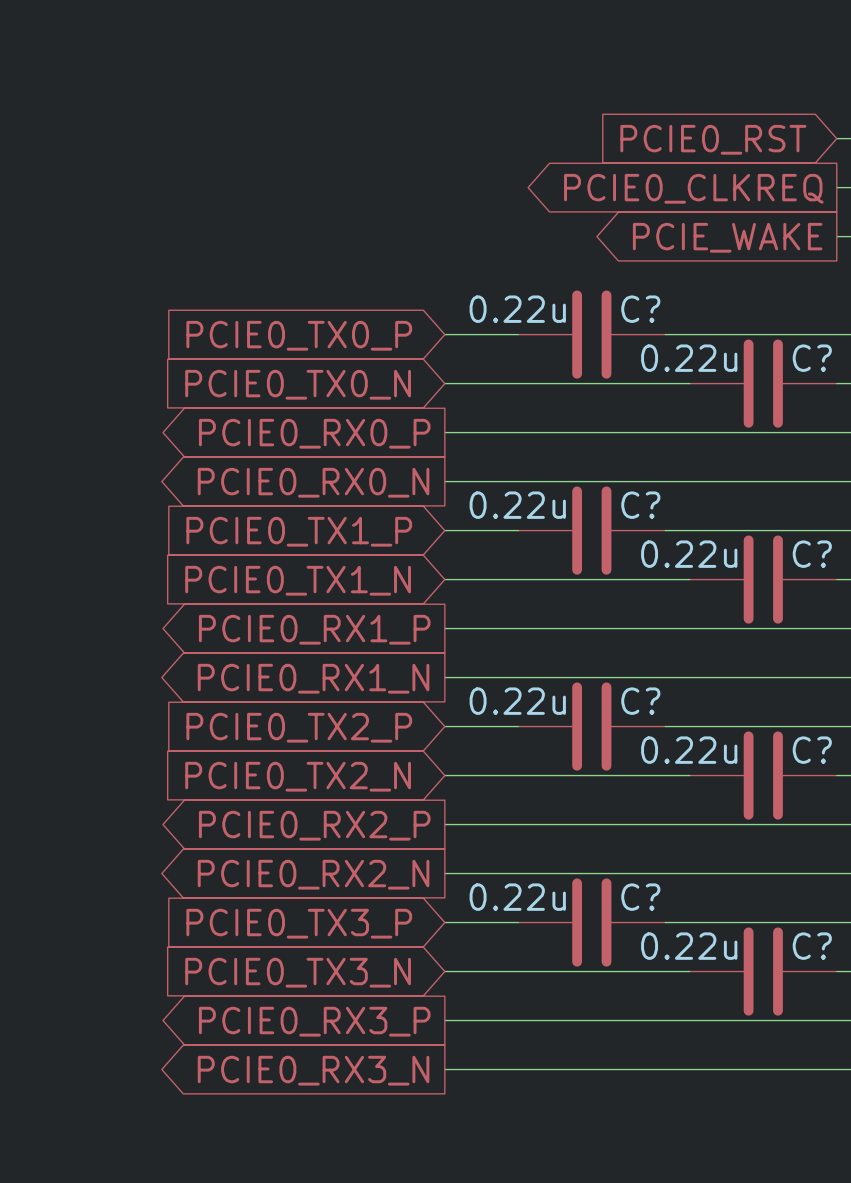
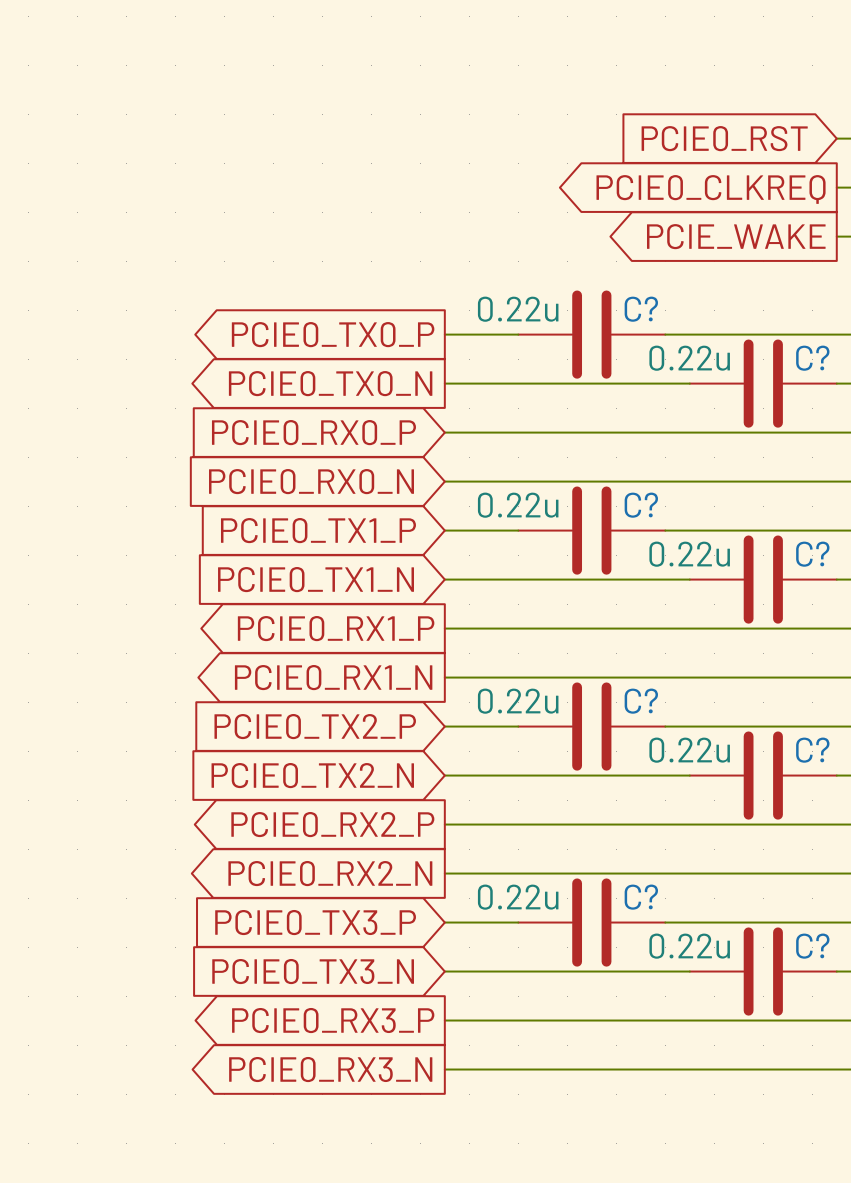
global label shape: input (299, 335) -> output (333, 334)
global label shape: input (298, 384) -> output (330, 383)
global label shape: output (314, 433) -> input (313, 432)
global label shape: output (313, 482) -> input (311, 481)

